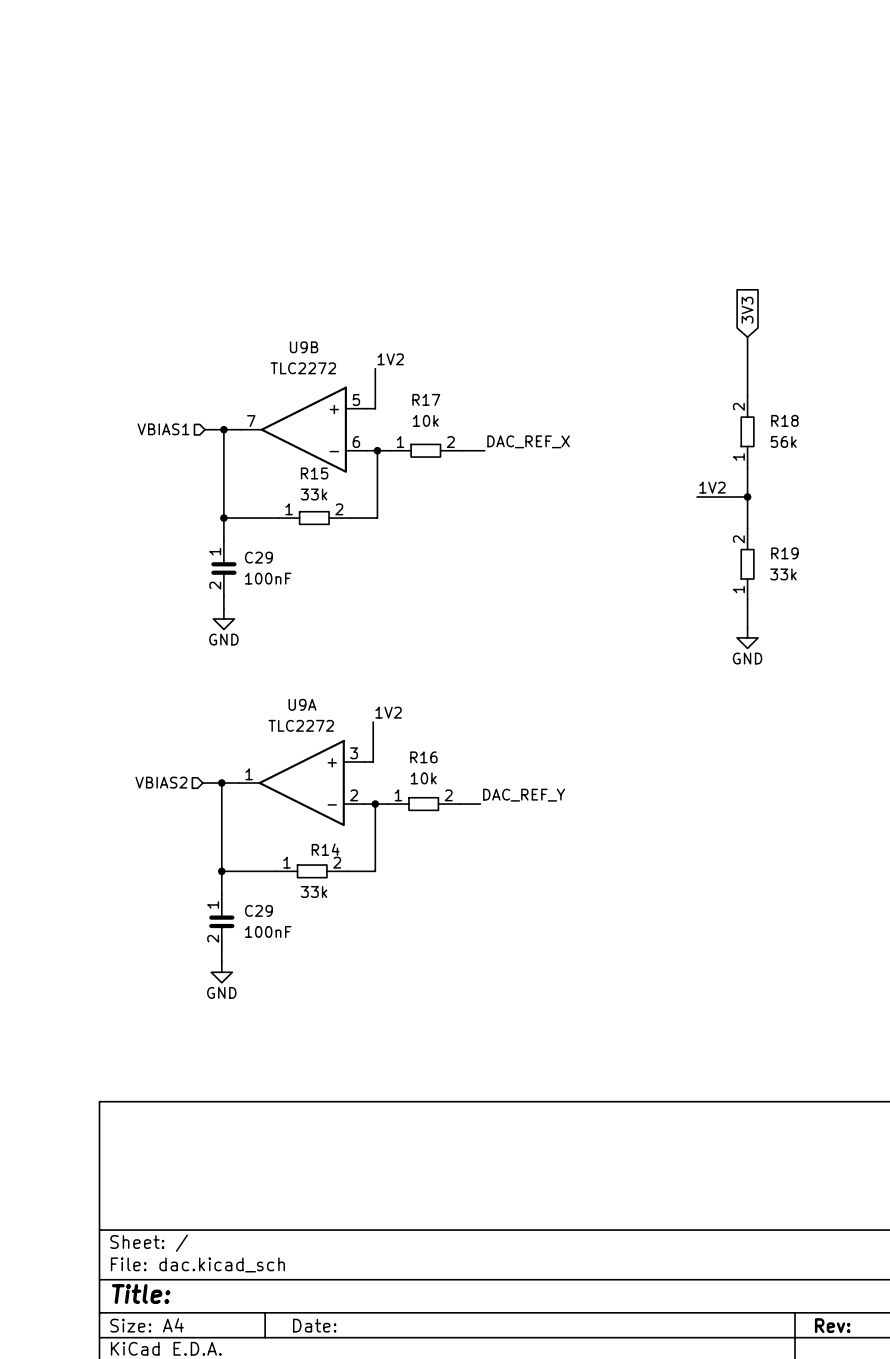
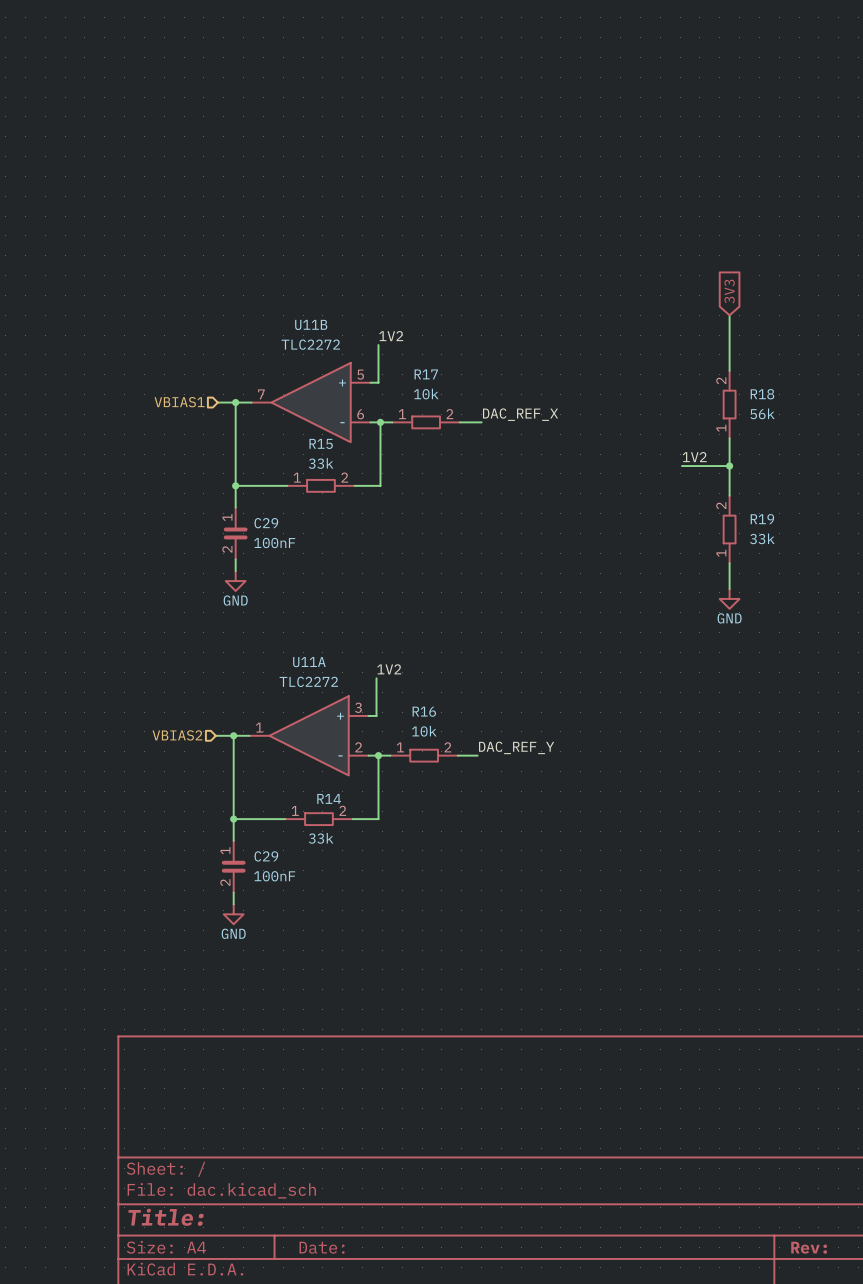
U9B name: U9B (304, 347) -> U11B (311, 324)
U9A name: U9A (302, 704) -> U11A (309, 662)

